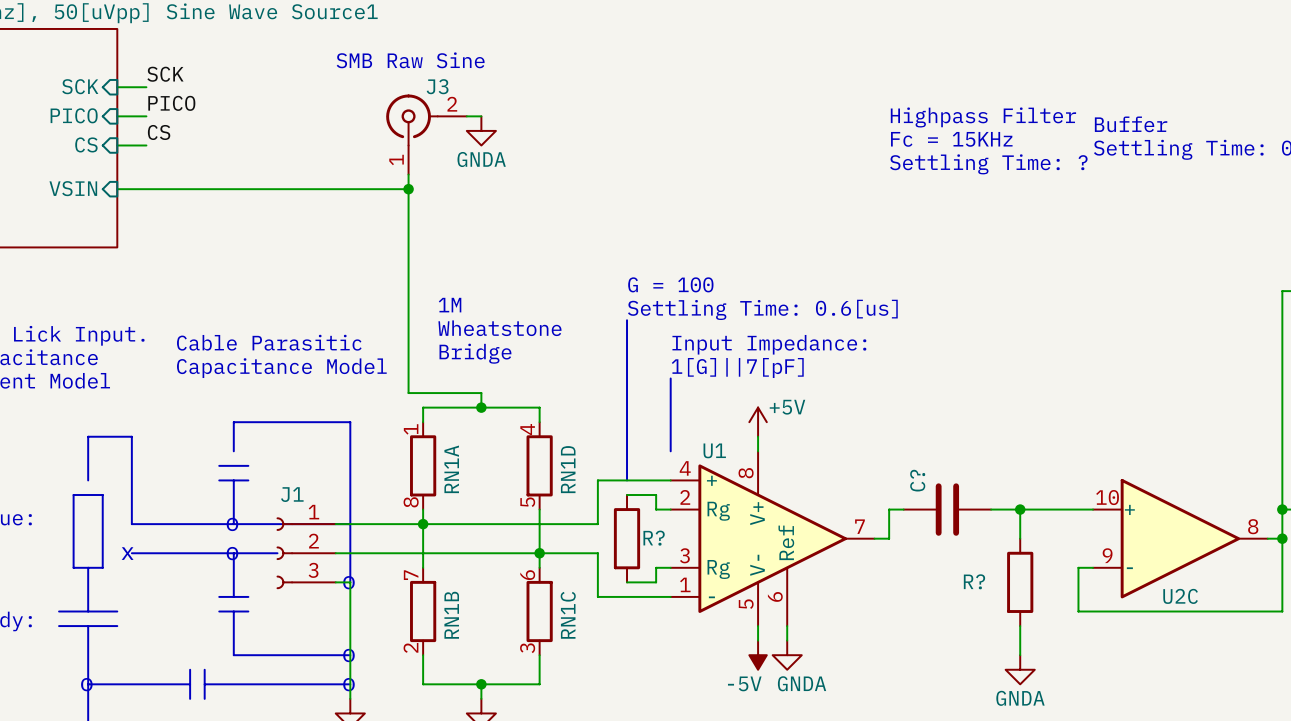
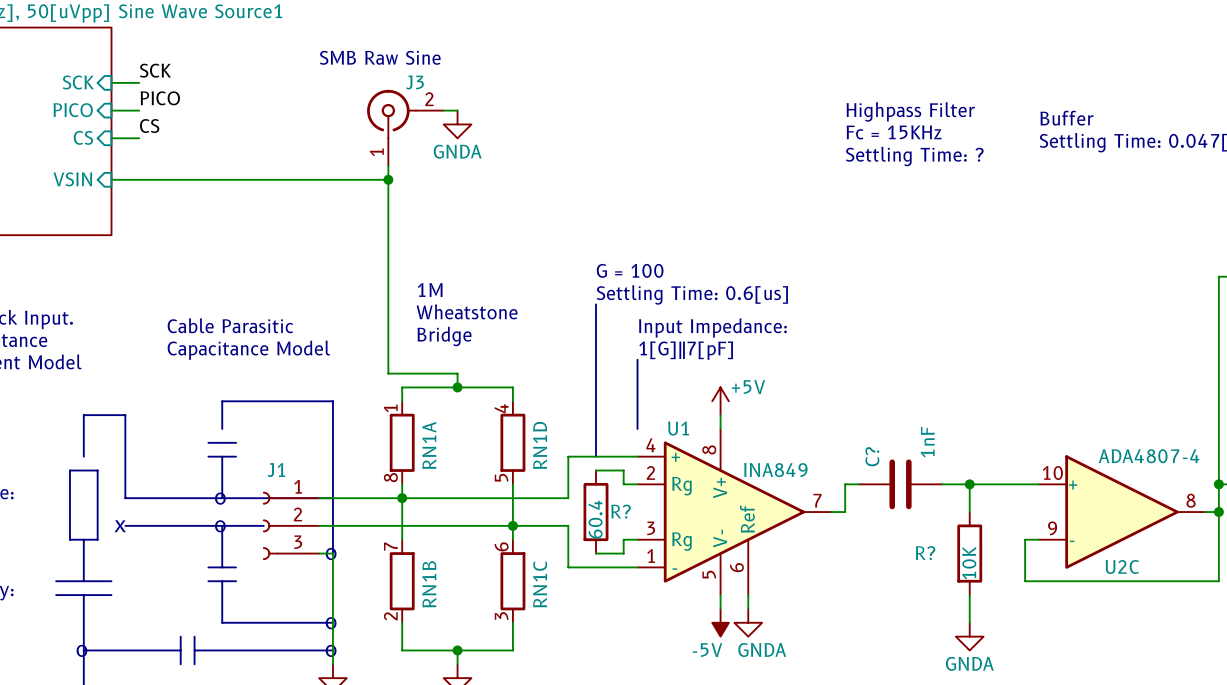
C? value: none -> 1nF (927, 442)
U2C value: none -> ADA4807-4 (1149, 456)
U1 value: none -> INA849 (775, 470)
R? value: none -> 60.4 (595, 519)
R? value: none -> 10K (969, 563)

